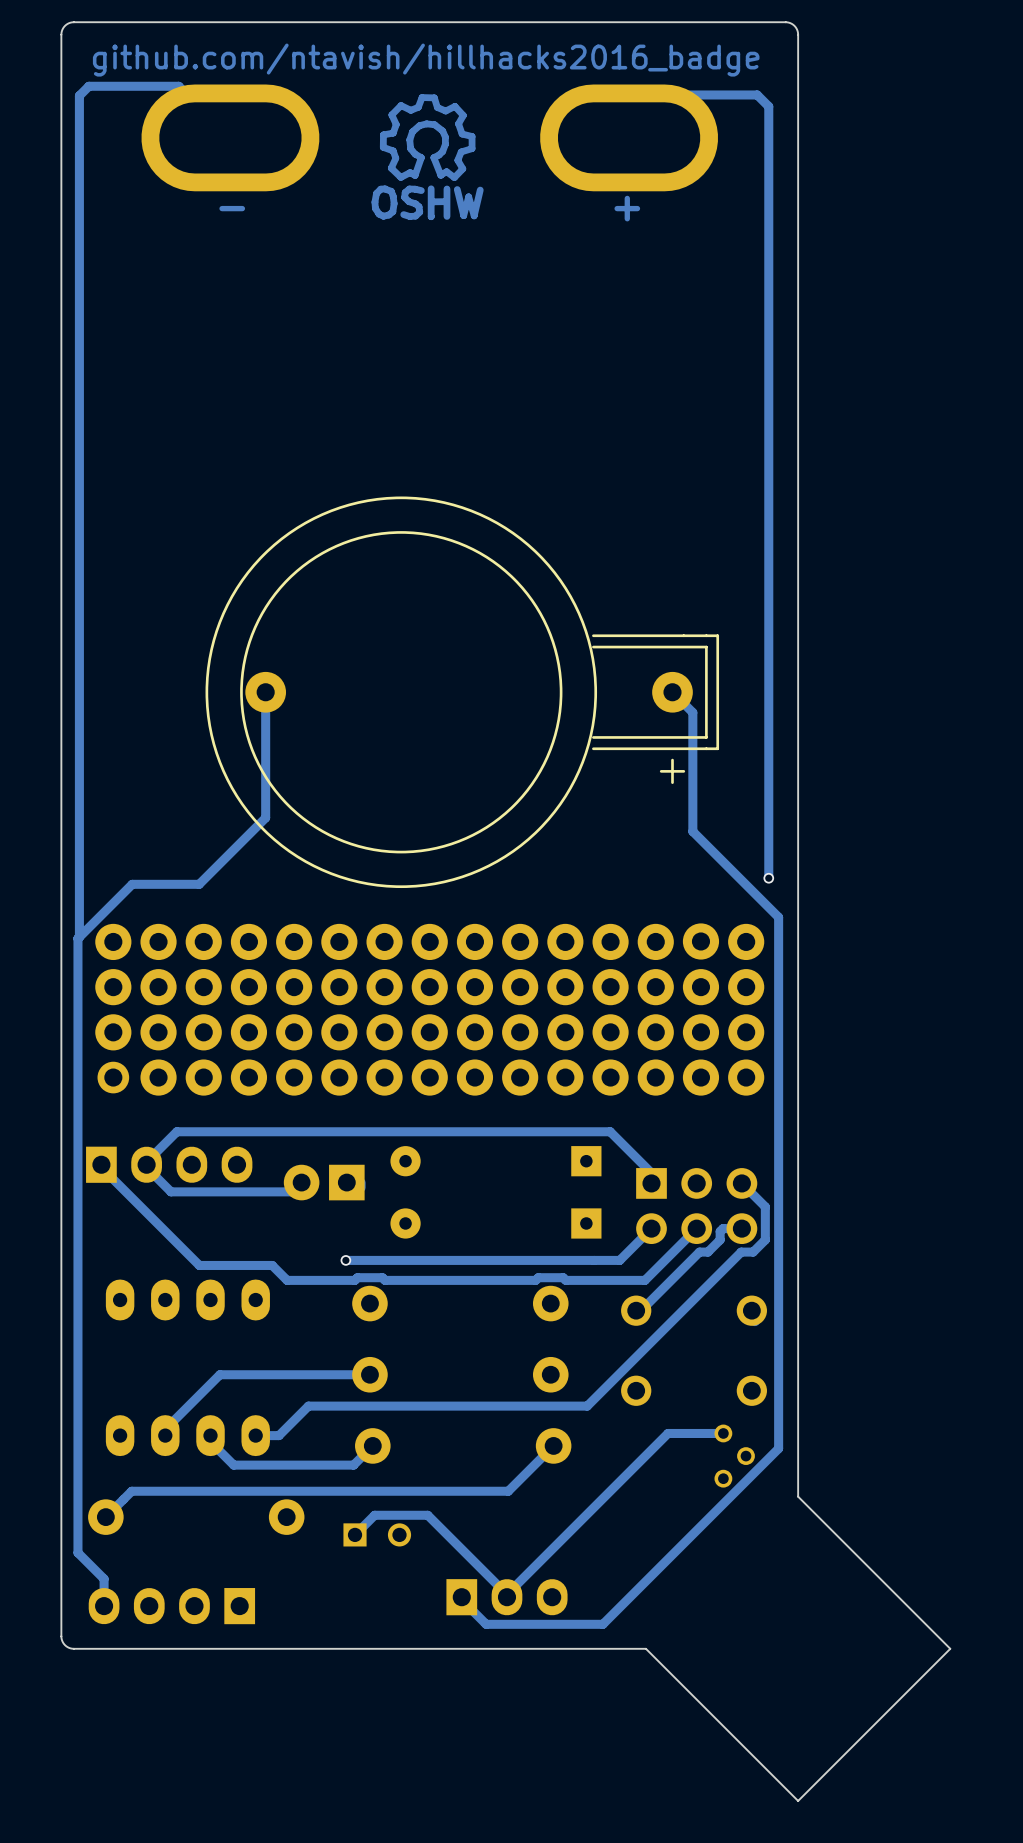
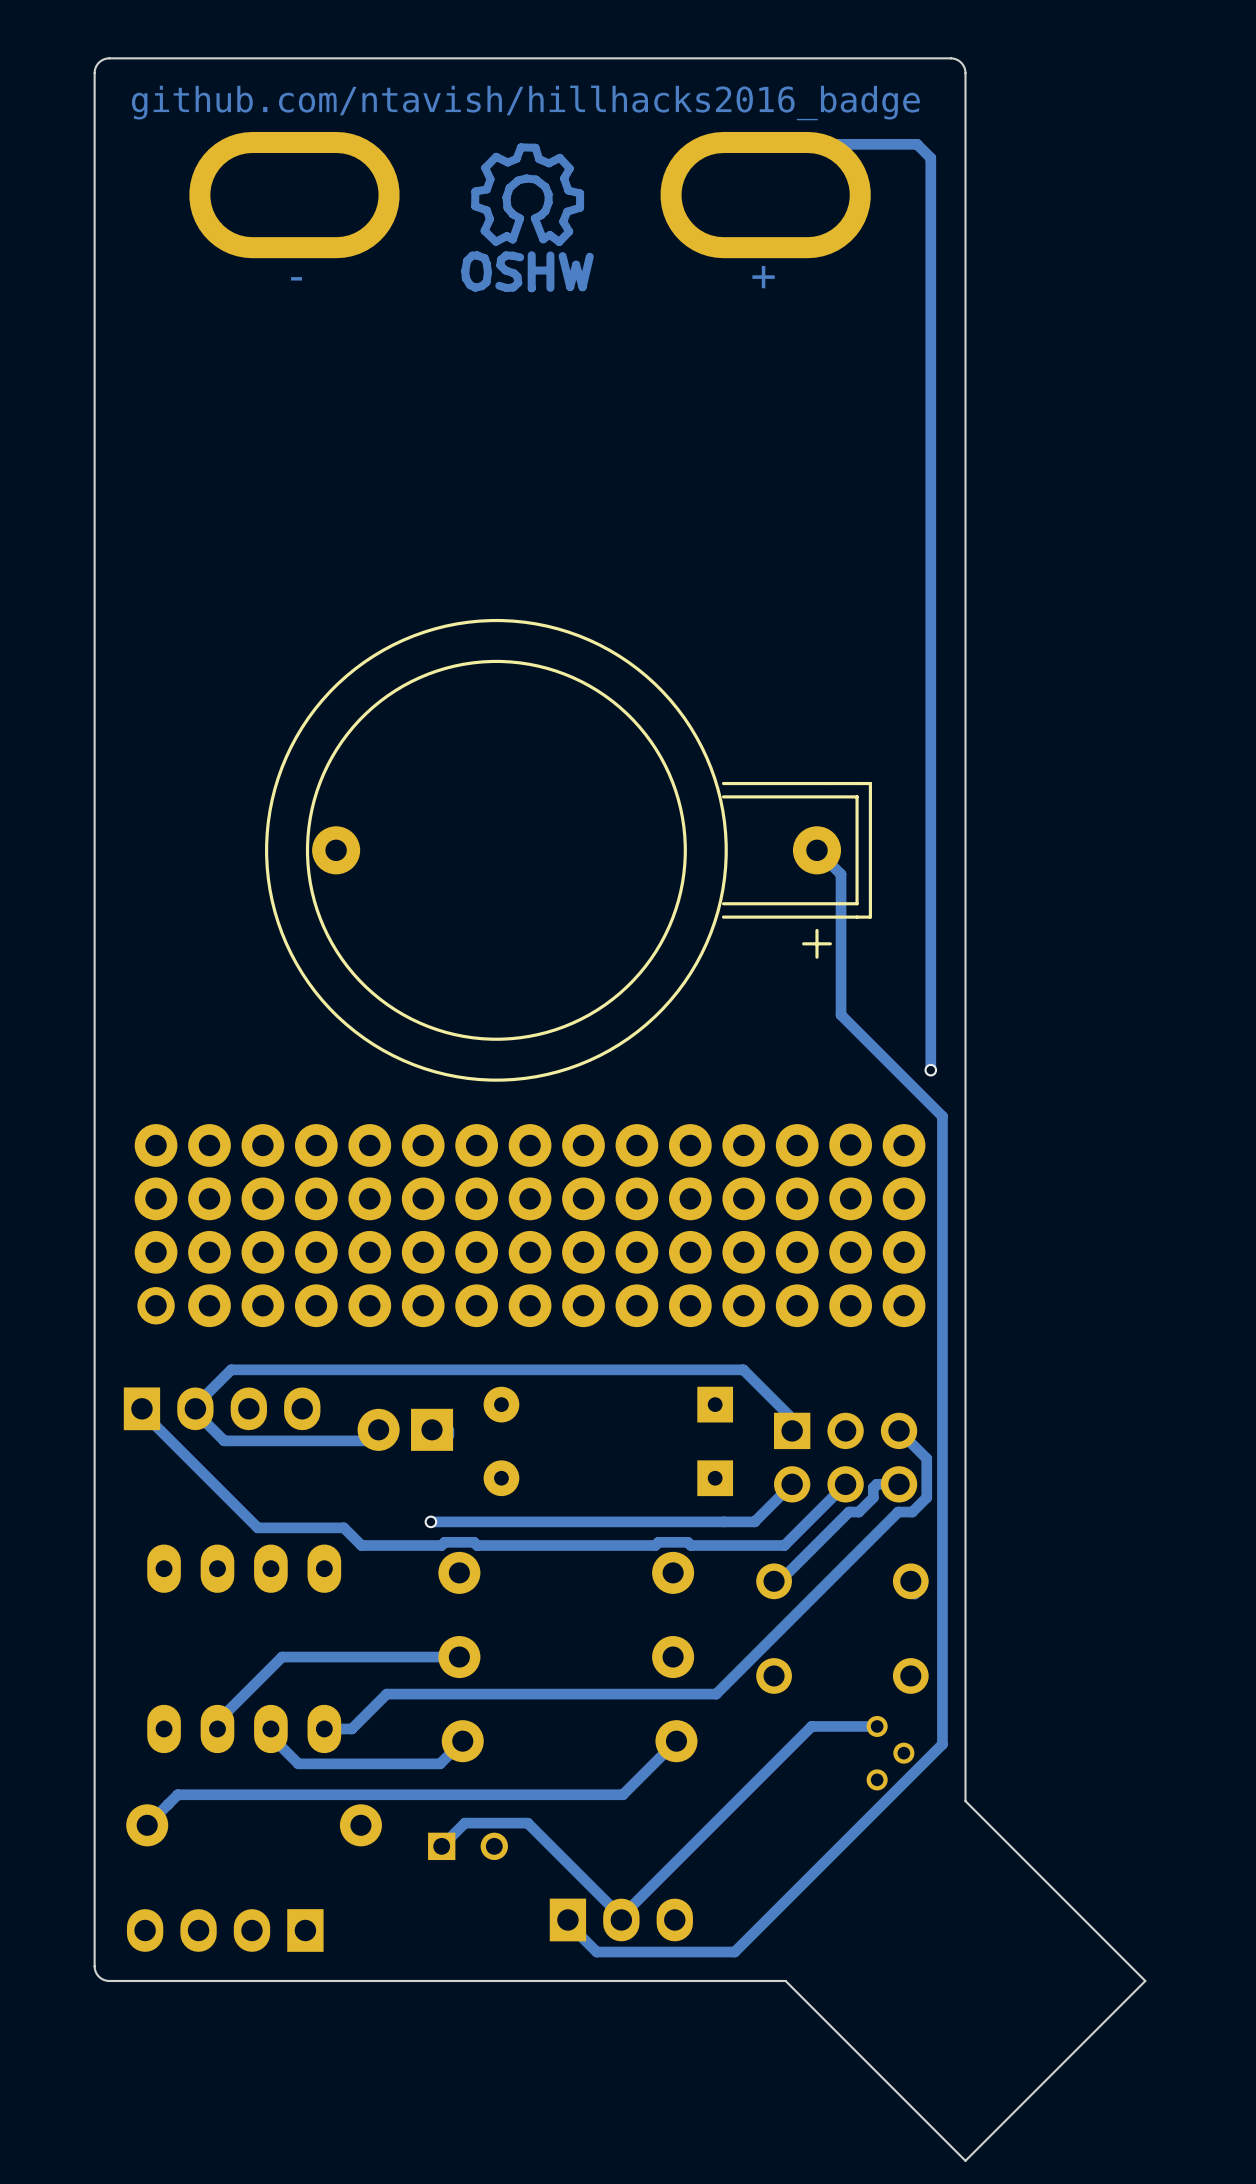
track: (230, 137) (178, 86) (88, 86) (79, 95) (79, 937) -> none
track: (265, 692) (265, 817) (199, 884) (132, 884) (77, 938) (77, 1552) (104, 1578) (104, 1606) -> none

